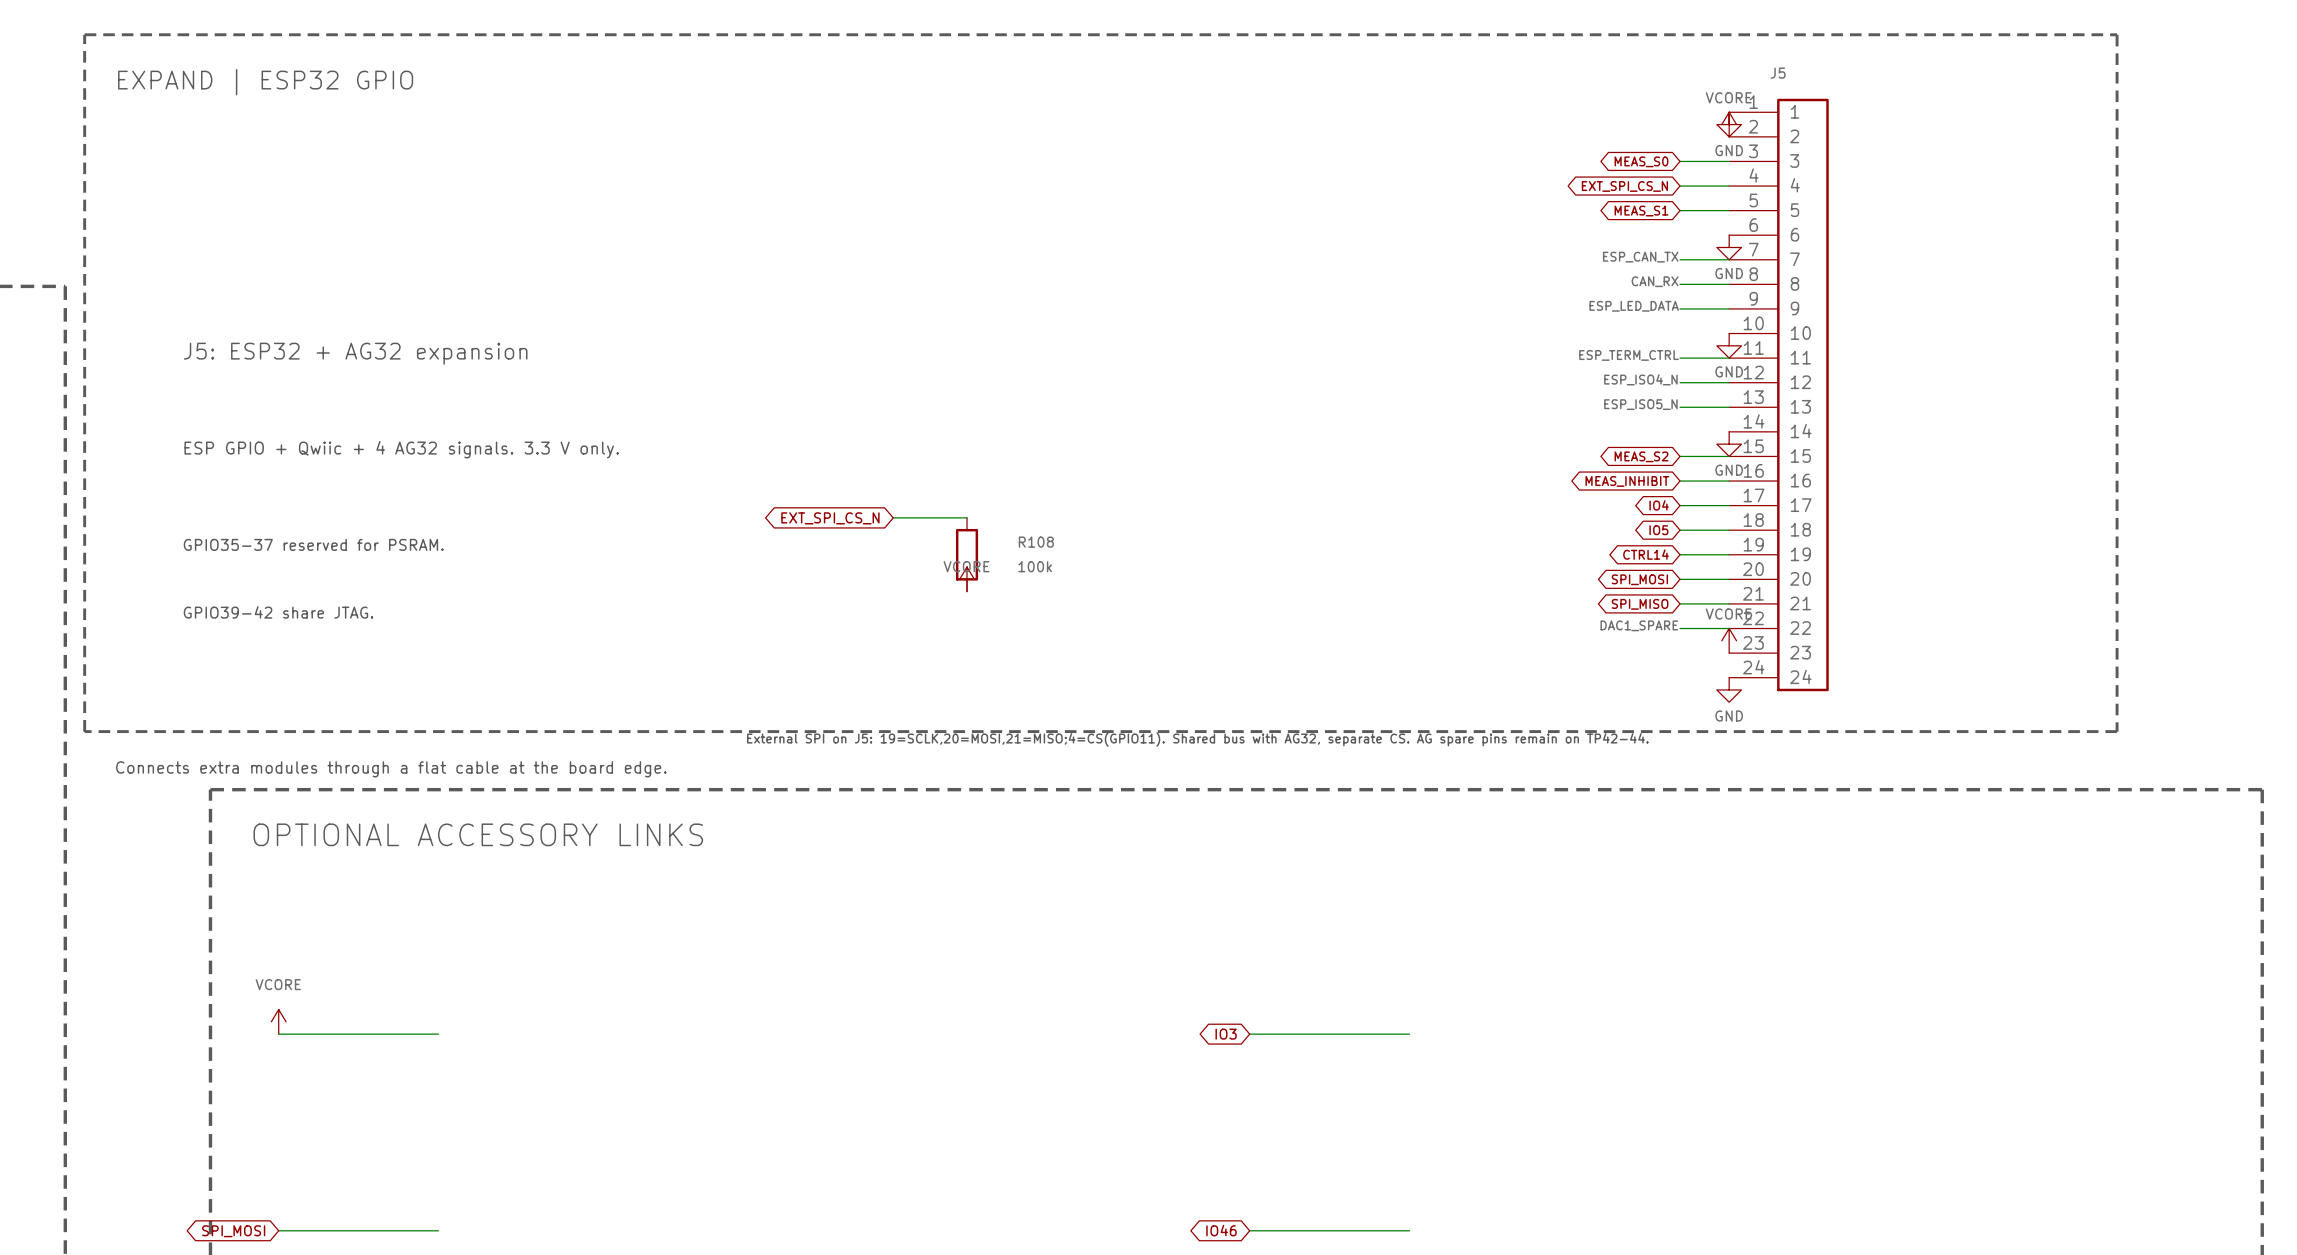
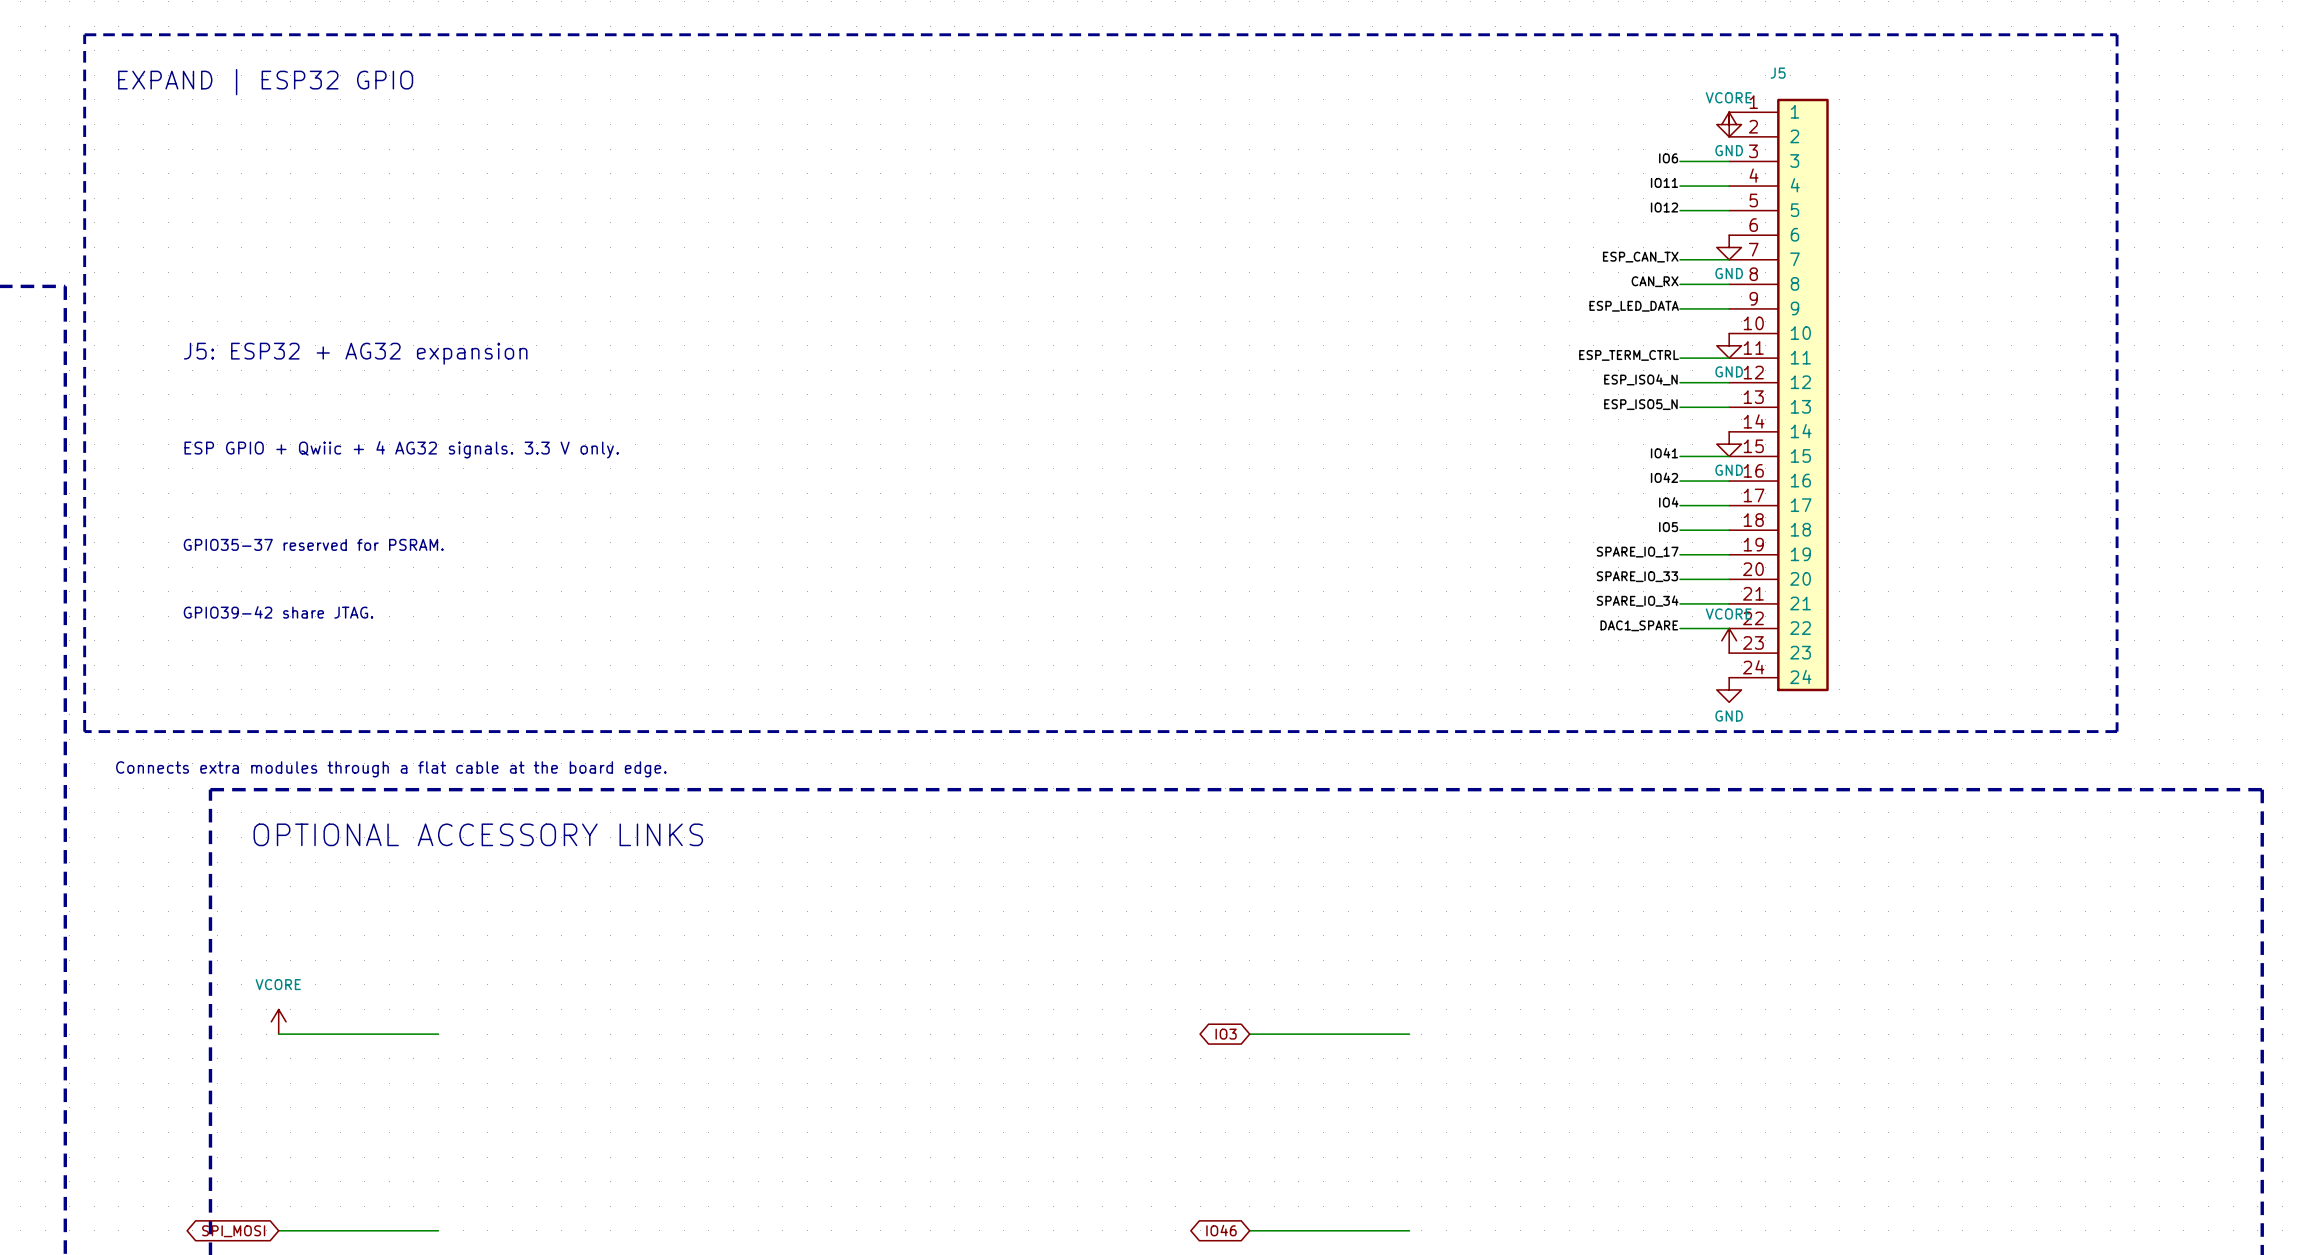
label: none -> IO6 (1668, 158)
global label: MEAS_S0 (1641, 161) -> none
label: none -> IO11 (1664, 182)
global label: EXT_SPI_CS_N (1624, 186) -> none
label: none -> IO12 (1664, 207)
global label: MEAS_S1 (1641, 211) -> none
label: none -> IO41 (1664, 453)
global label: MEAS_S2 (1641, 456) -> none
label: none -> IO42 (1664, 477)
global label: MEAS_INHIBIT (1627, 481) -> none
label: none -> IO4 (1668, 502)
global label: IO4 (1659, 505) -> none
wire: (893, 517) (967, 517) -> none
global label: EXT_SPI_CS_N (830, 518) -> none
label: none -> IO5 (1668, 527)
global label: IO5 (1658, 530) -> none
label: none -> SPARE_IO_17 (1637, 552)
R108: 100k (967, 554) -> none
global label: CTRL14 (1646, 554) -> none
label: none -> SPARE_IO_33 (1637, 576)
power symbol: VCORE (967, 579) -> none
global label: SPI_MOSI (1639, 579) -> none
label: none -> SPARE_IO_34 (1637, 601)
global label: SPI_MISO (1640, 604) -> none
text: External SPI on J5: 19=SCLK,20=MOSI,21=MISO;4=CS(GPIO11). Shared bus with AG32, separate CS. AG spare pins remain on TP42-44. (1197, 739) -> none

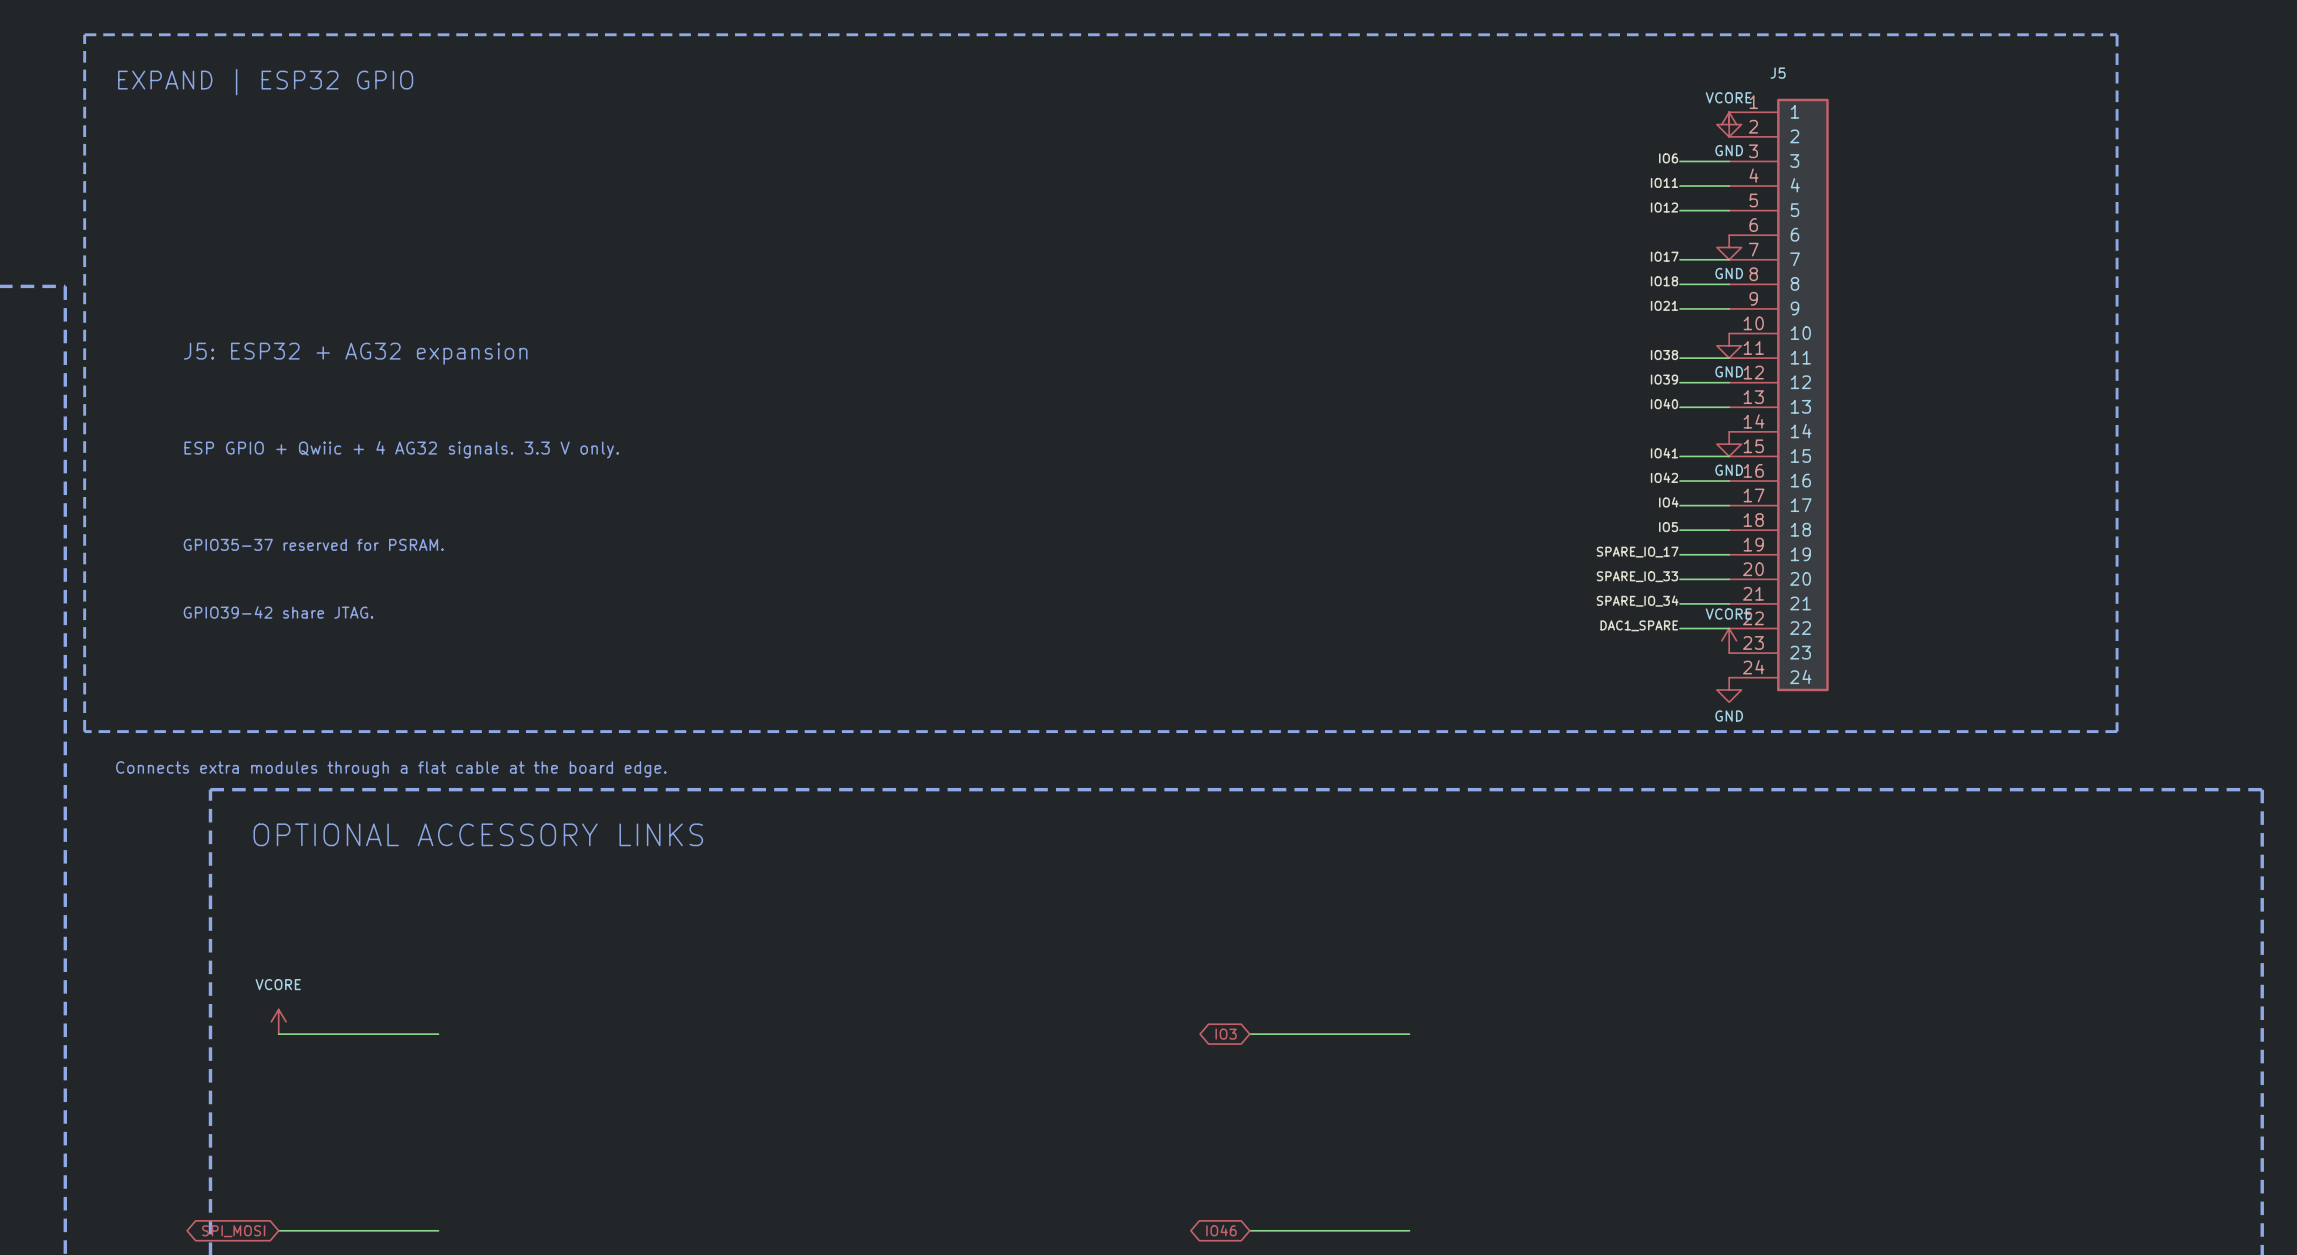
label: ESP_CAN_TX (1640, 257) -> IO17 (1664, 256)
label: CAN_RX (1655, 281) -> IO18 (1664, 281)
label: ESP_LED_DATA (1634, 306) -> IO21 (1664, 305)
label: ESP_TERM_CTRL (1629, 355) -> IO38 (1664, 355)
label: ESP_ISO4_N (1640, 379) -> IO39 (1664, 379)
label: ESP_ISO5_N (1640, 404) -> IO40 (1664, 403)

